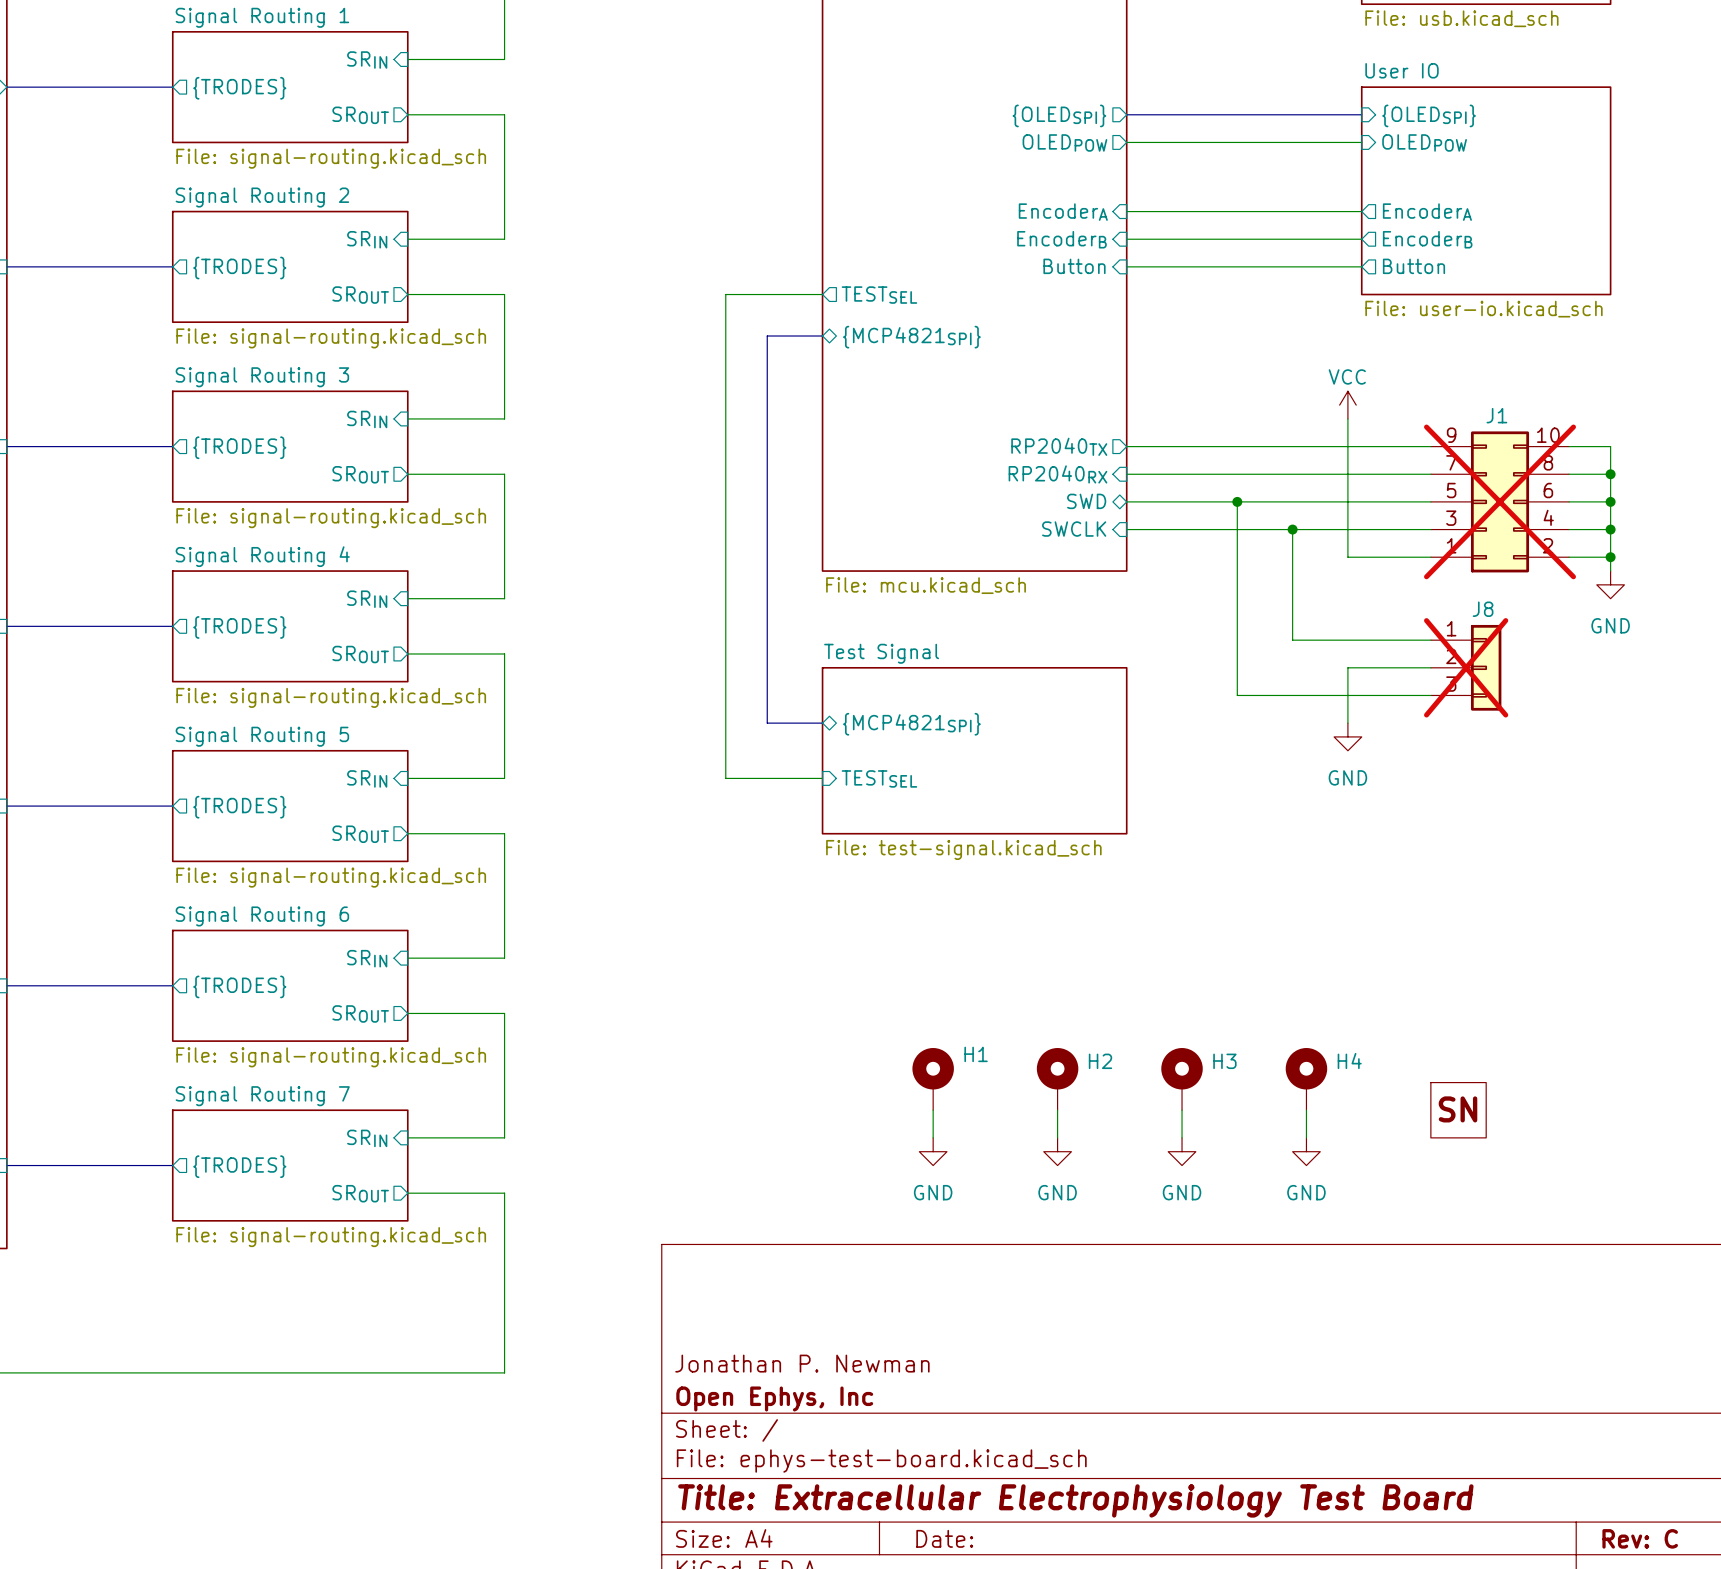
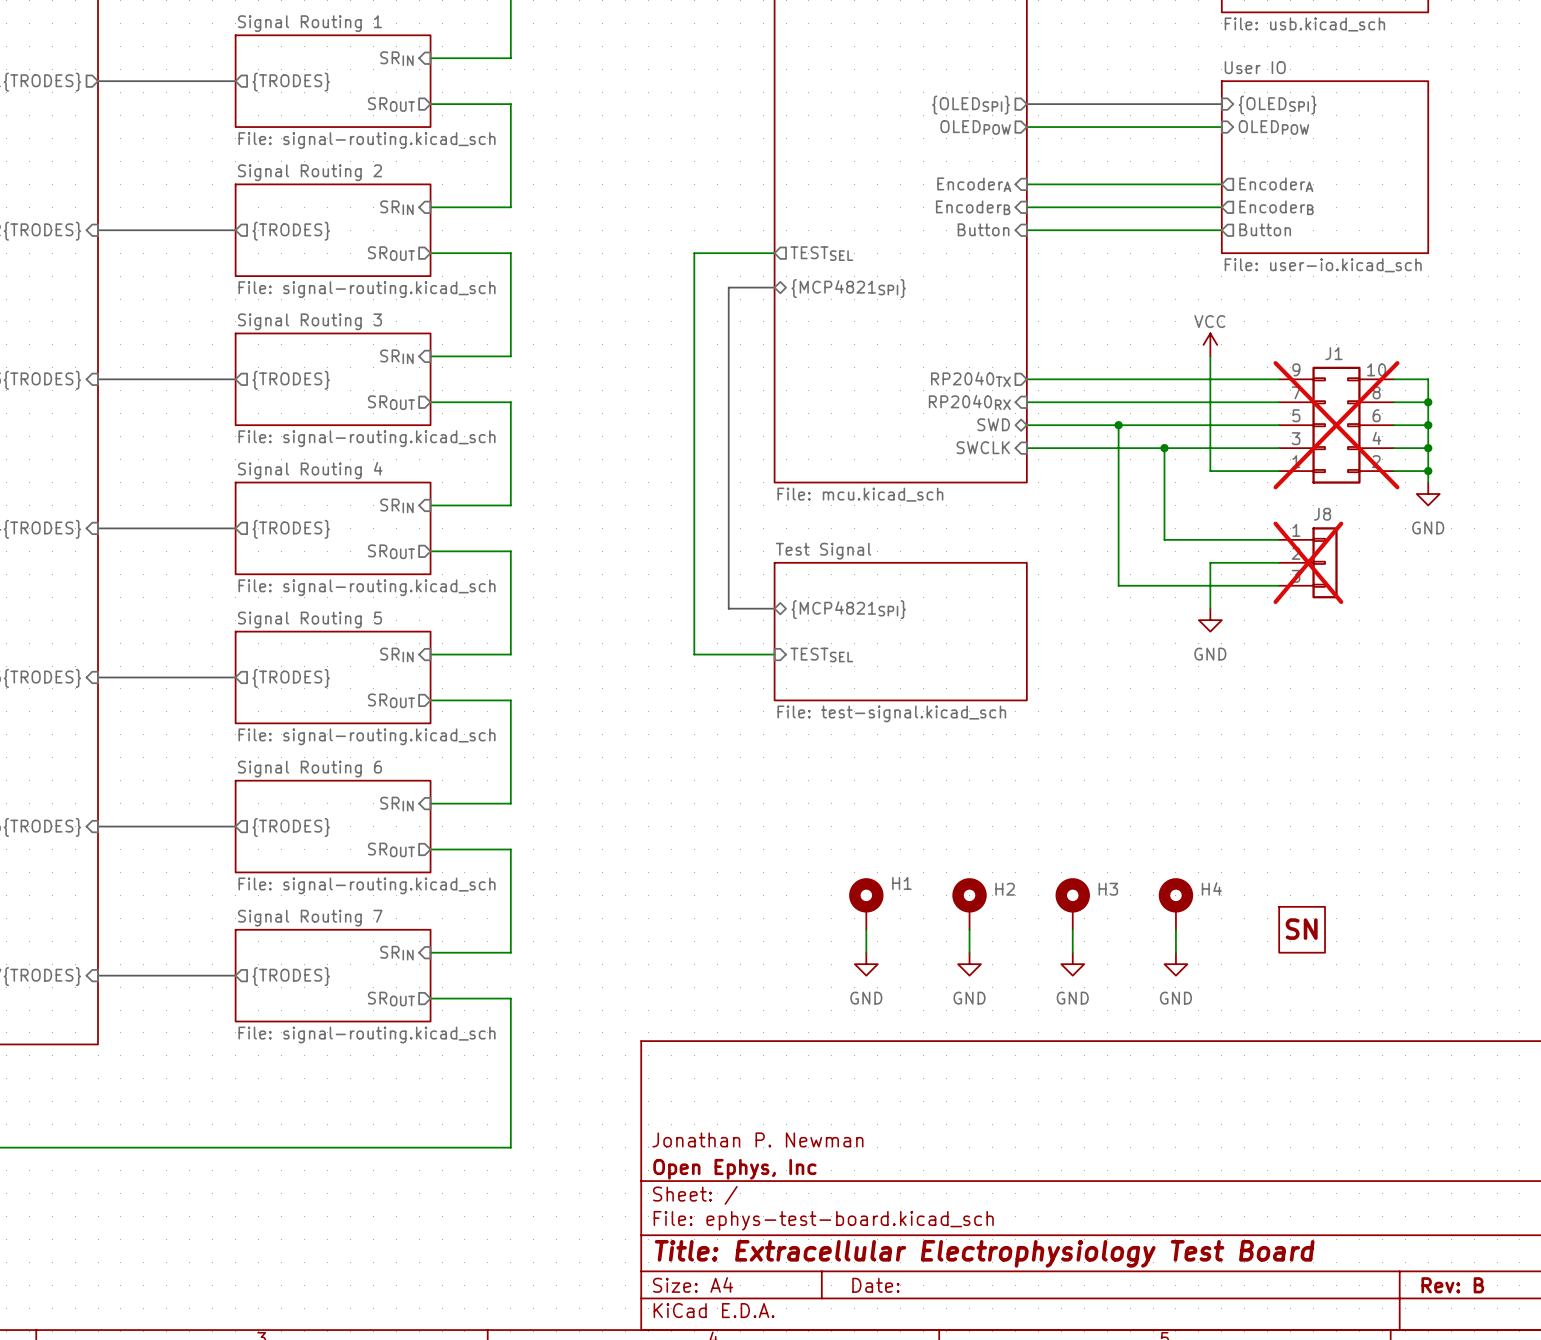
title block: Rev: C (1640, 1538) -> Rev: B (1452, 1285)

